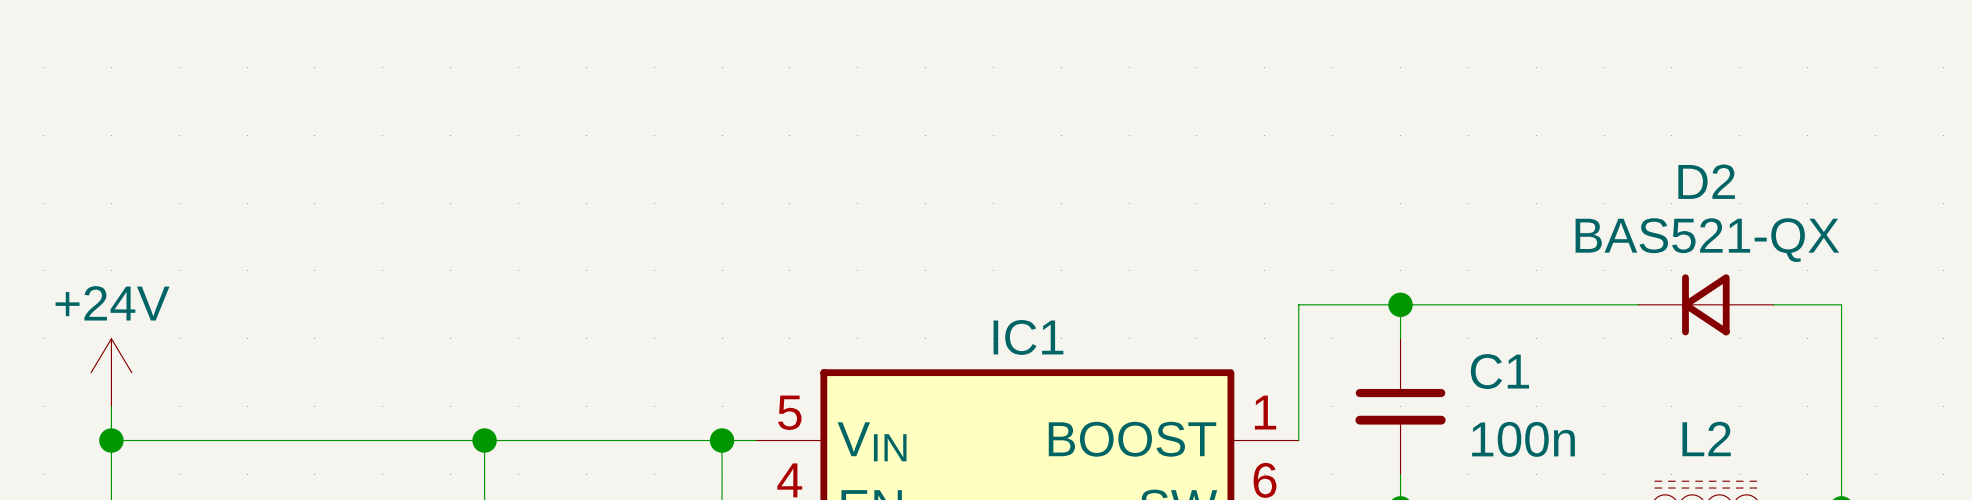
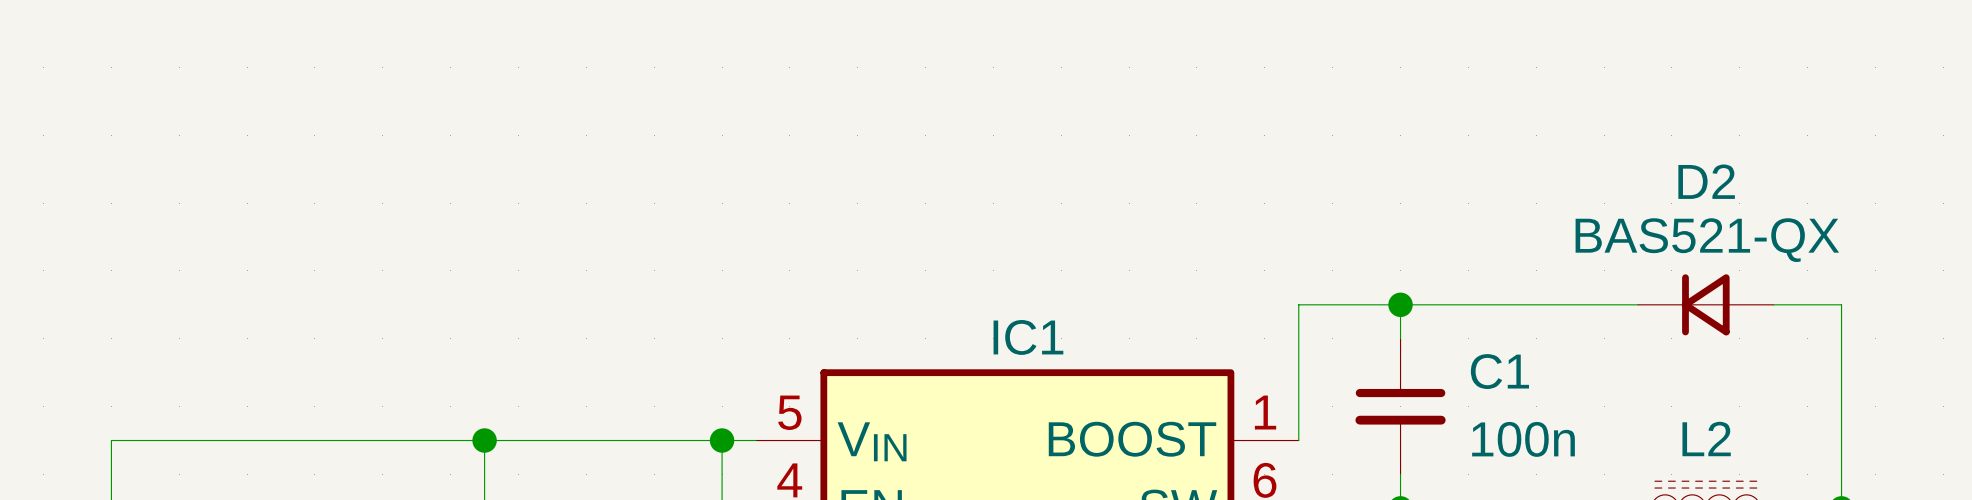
power symbol: +24V (111, 372) -> none
wire: (111, 406) (111, 440) -> none
junction: (111, 440) -> none

